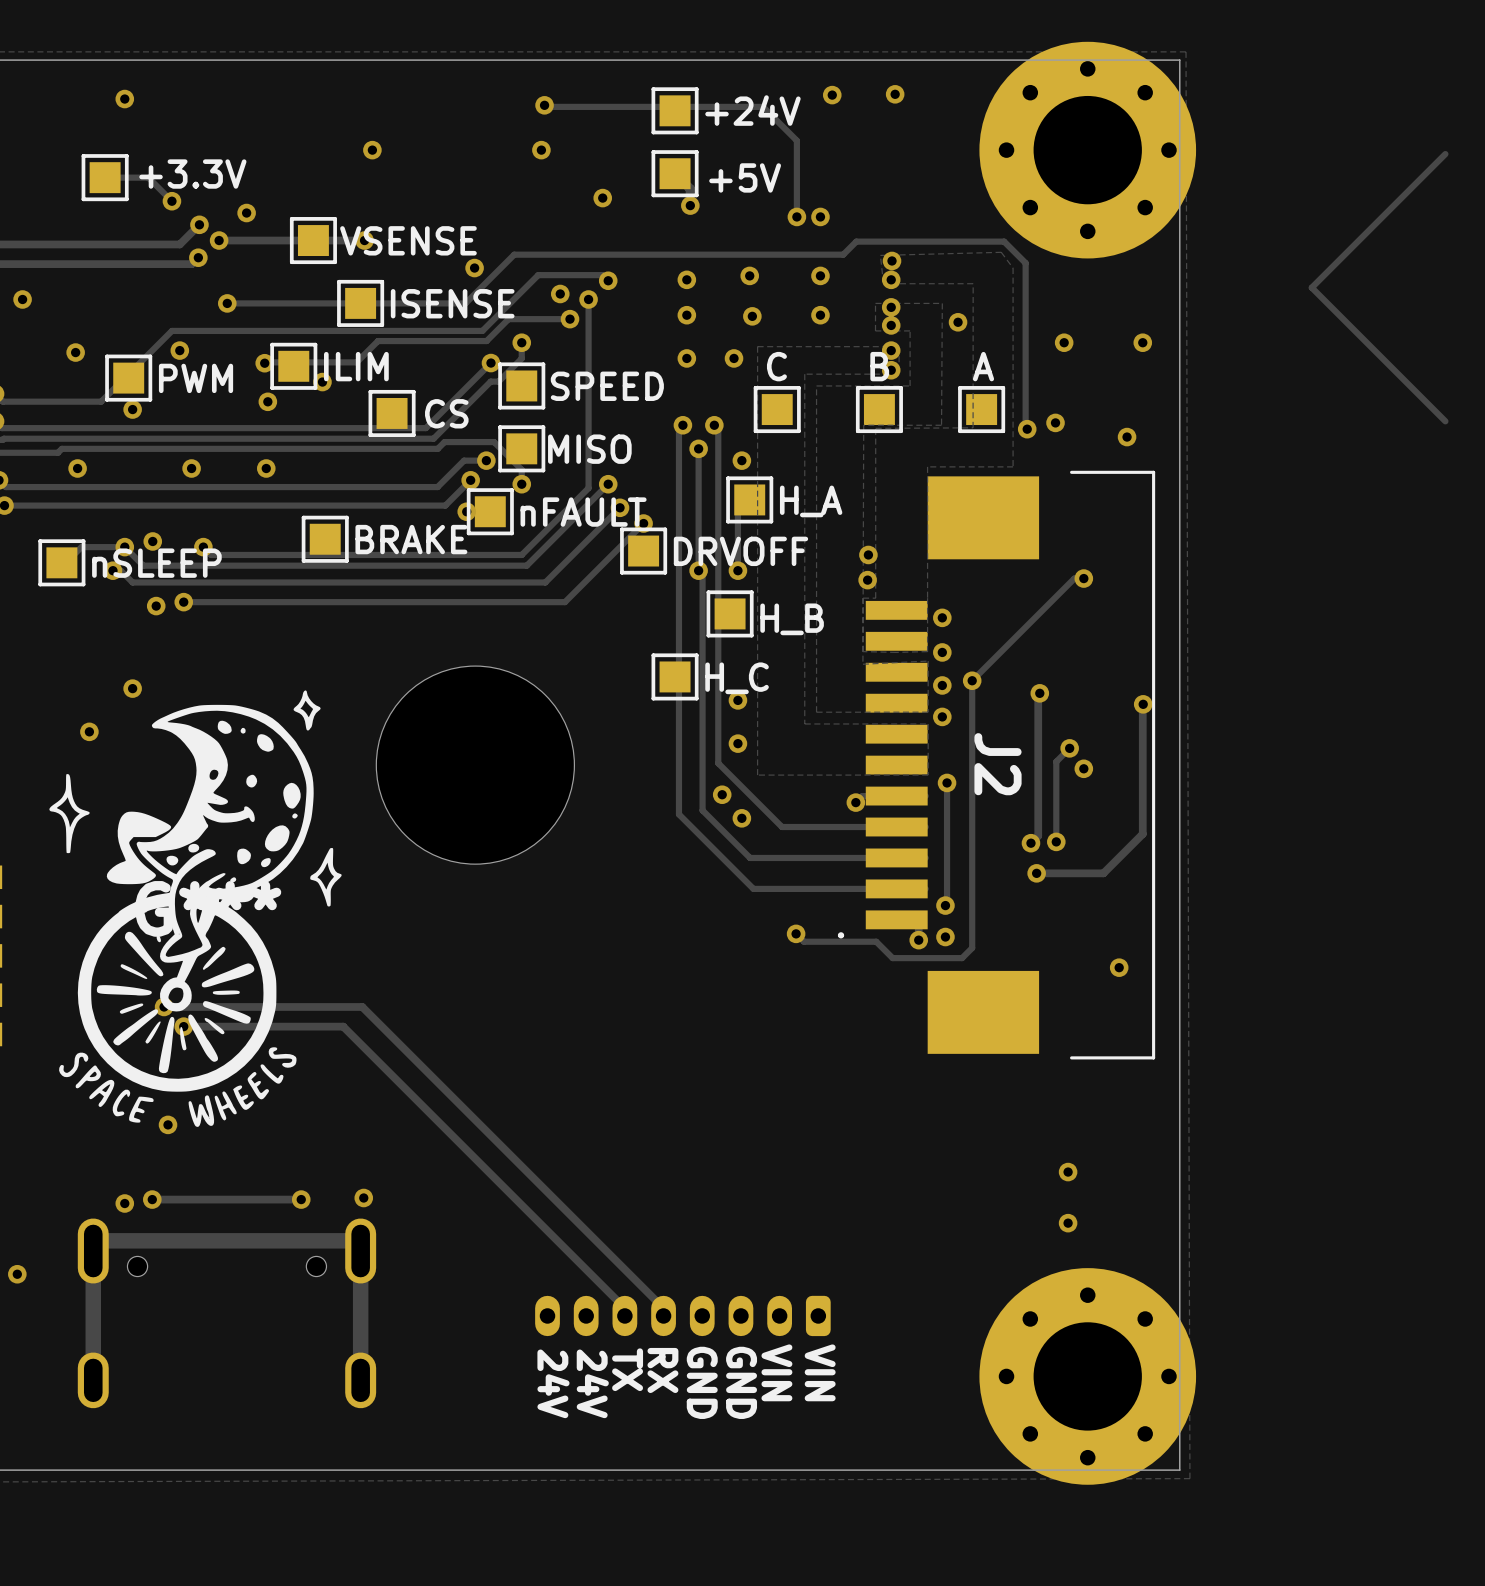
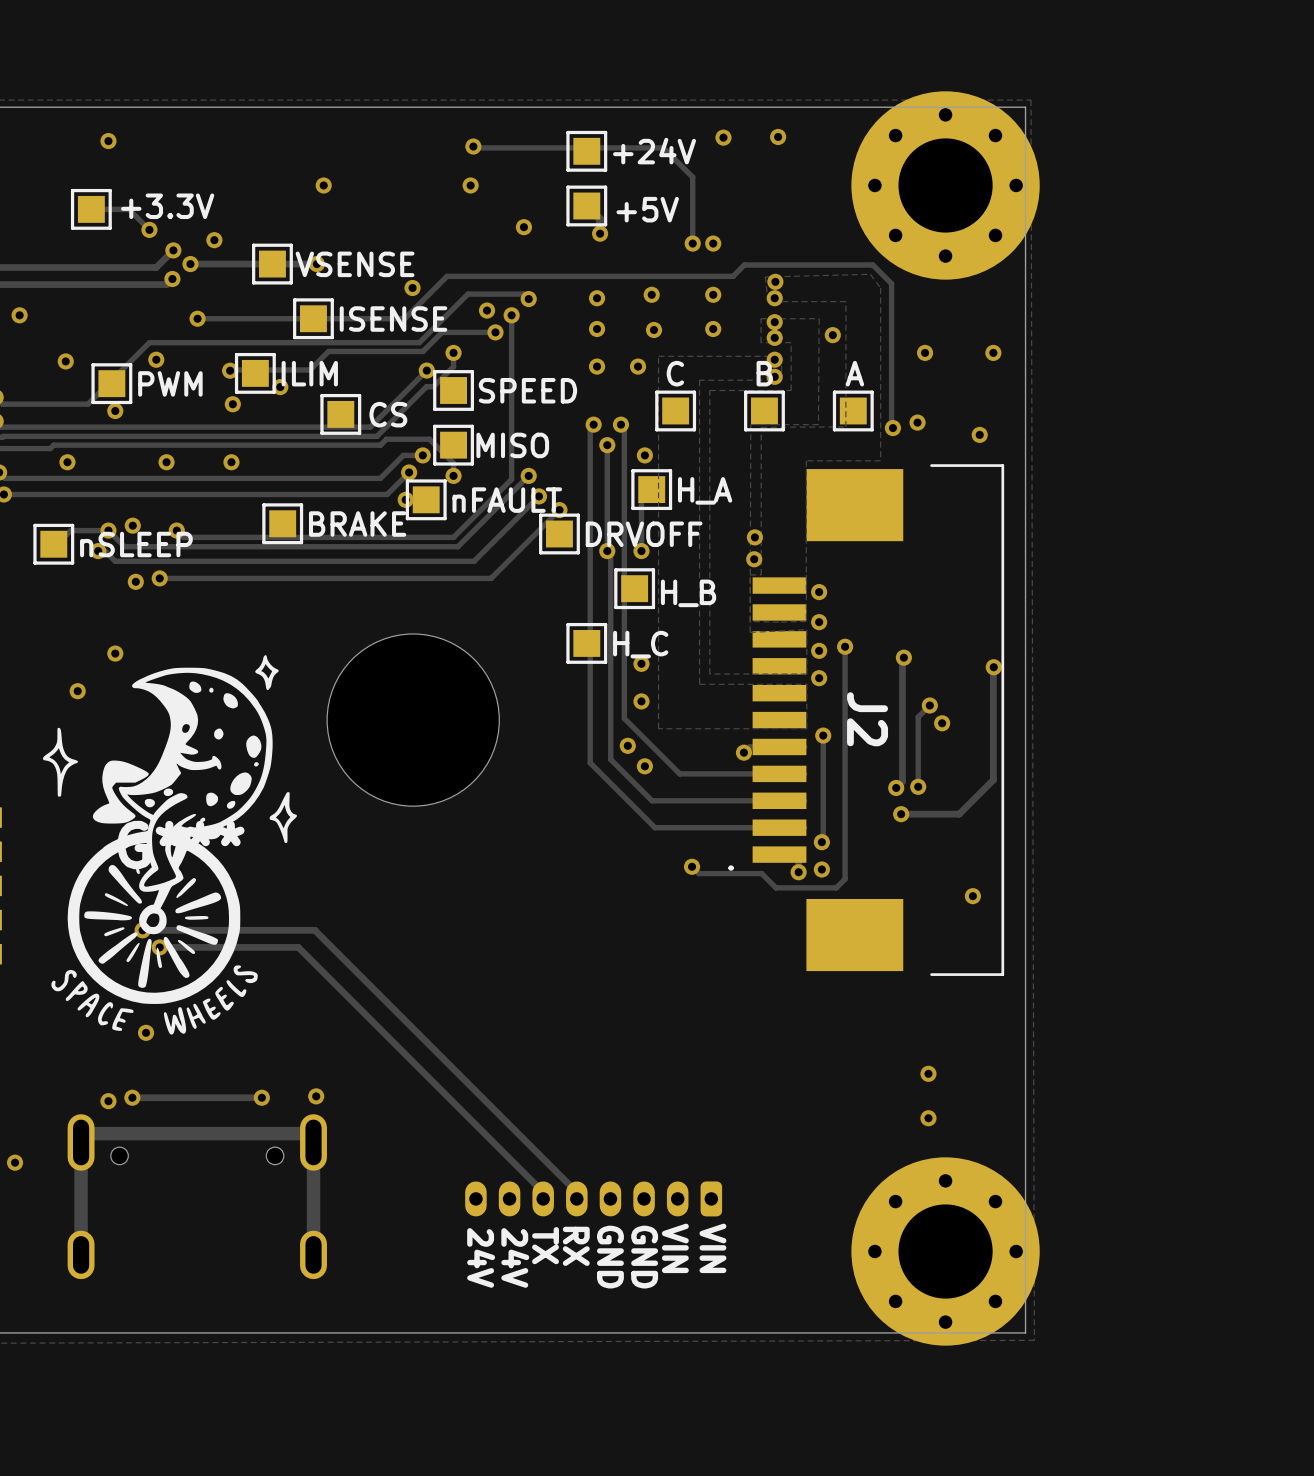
track: (1445, 154) (1311, 287) (1445, 421) -> none
track: (1083, 578) (1074, 578) (972, 680) -> none
via: (1083, 578) -> none

